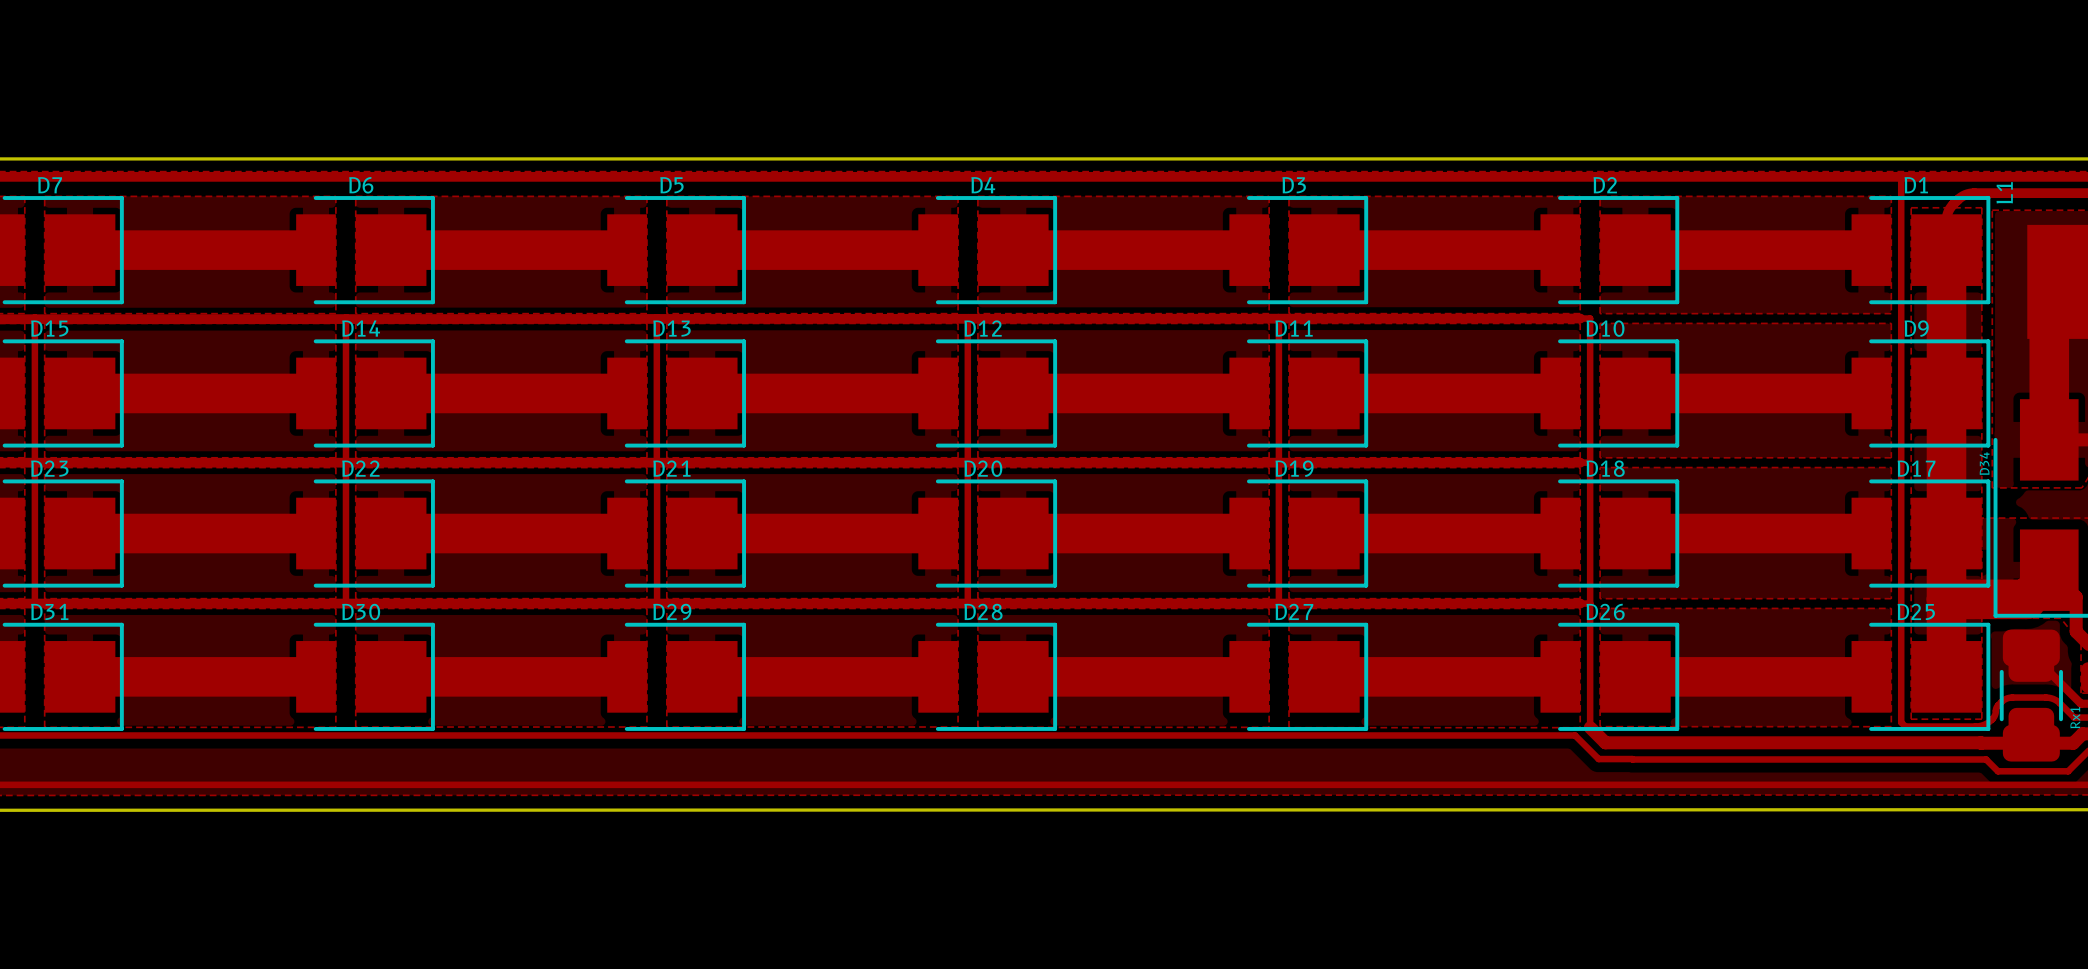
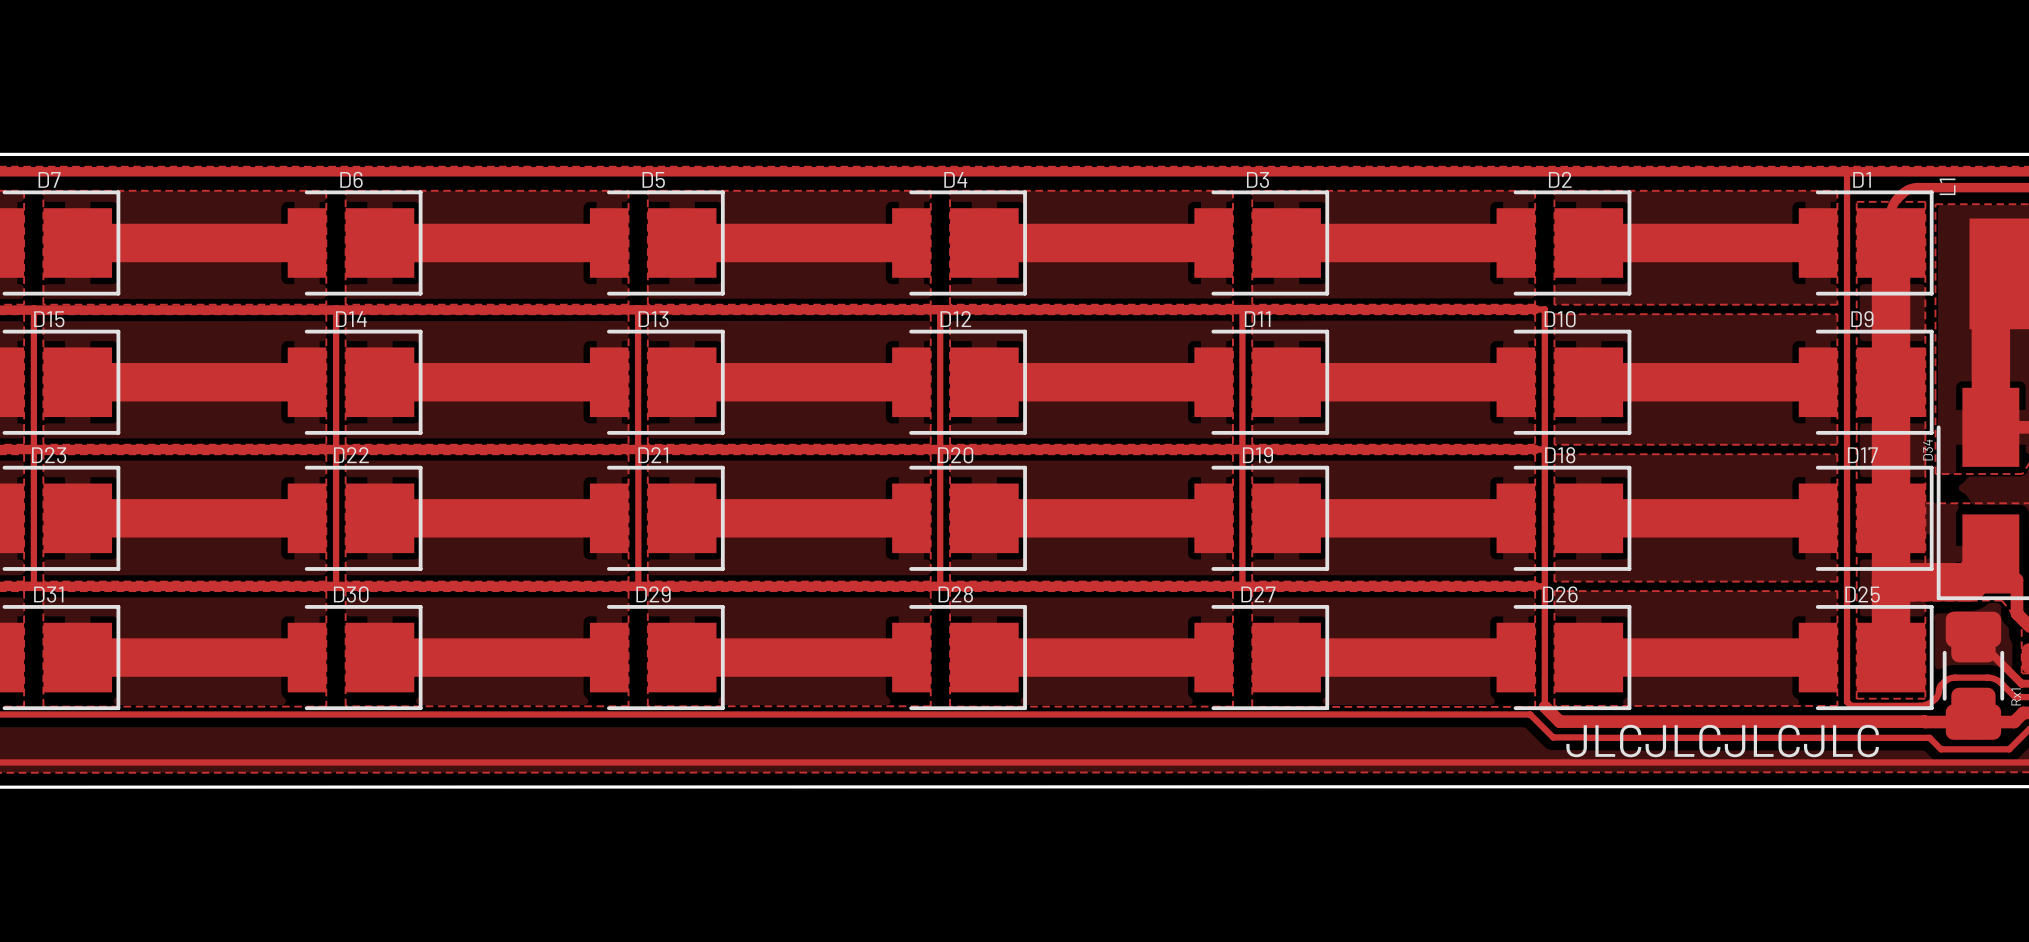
text: none -> JLCJLCJLCJLC (1722, 741)

